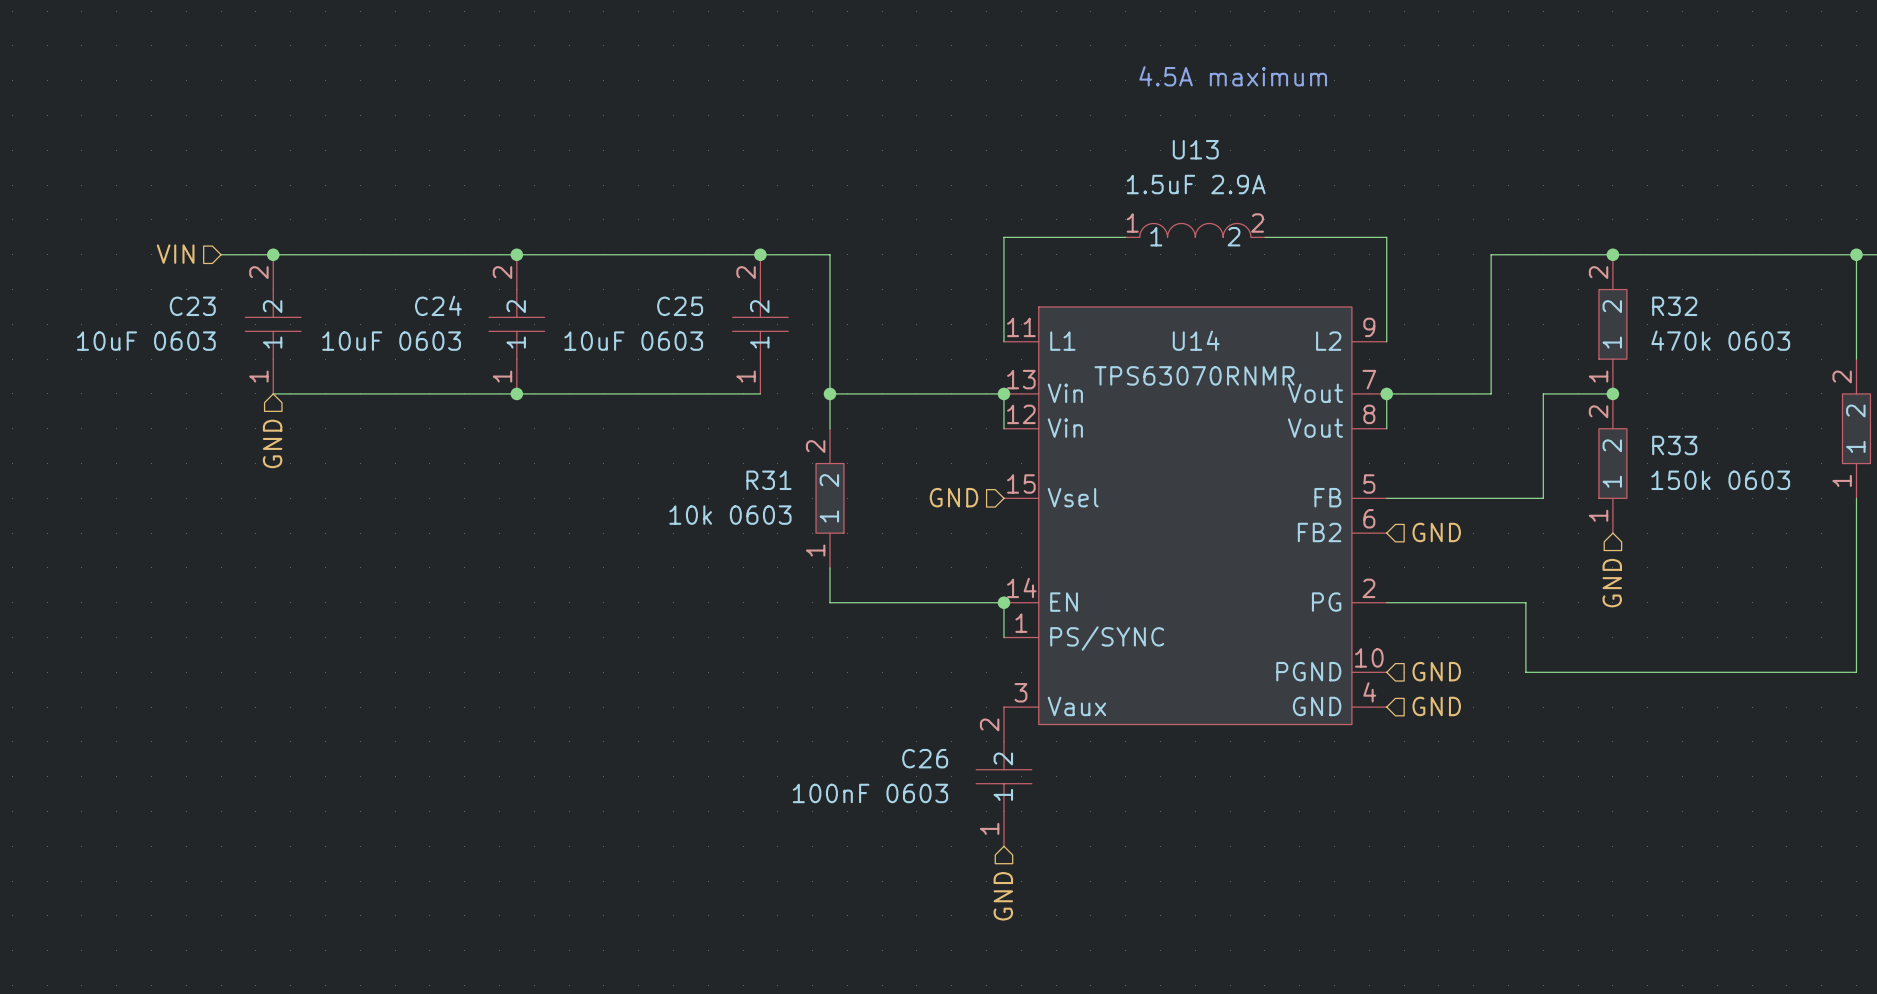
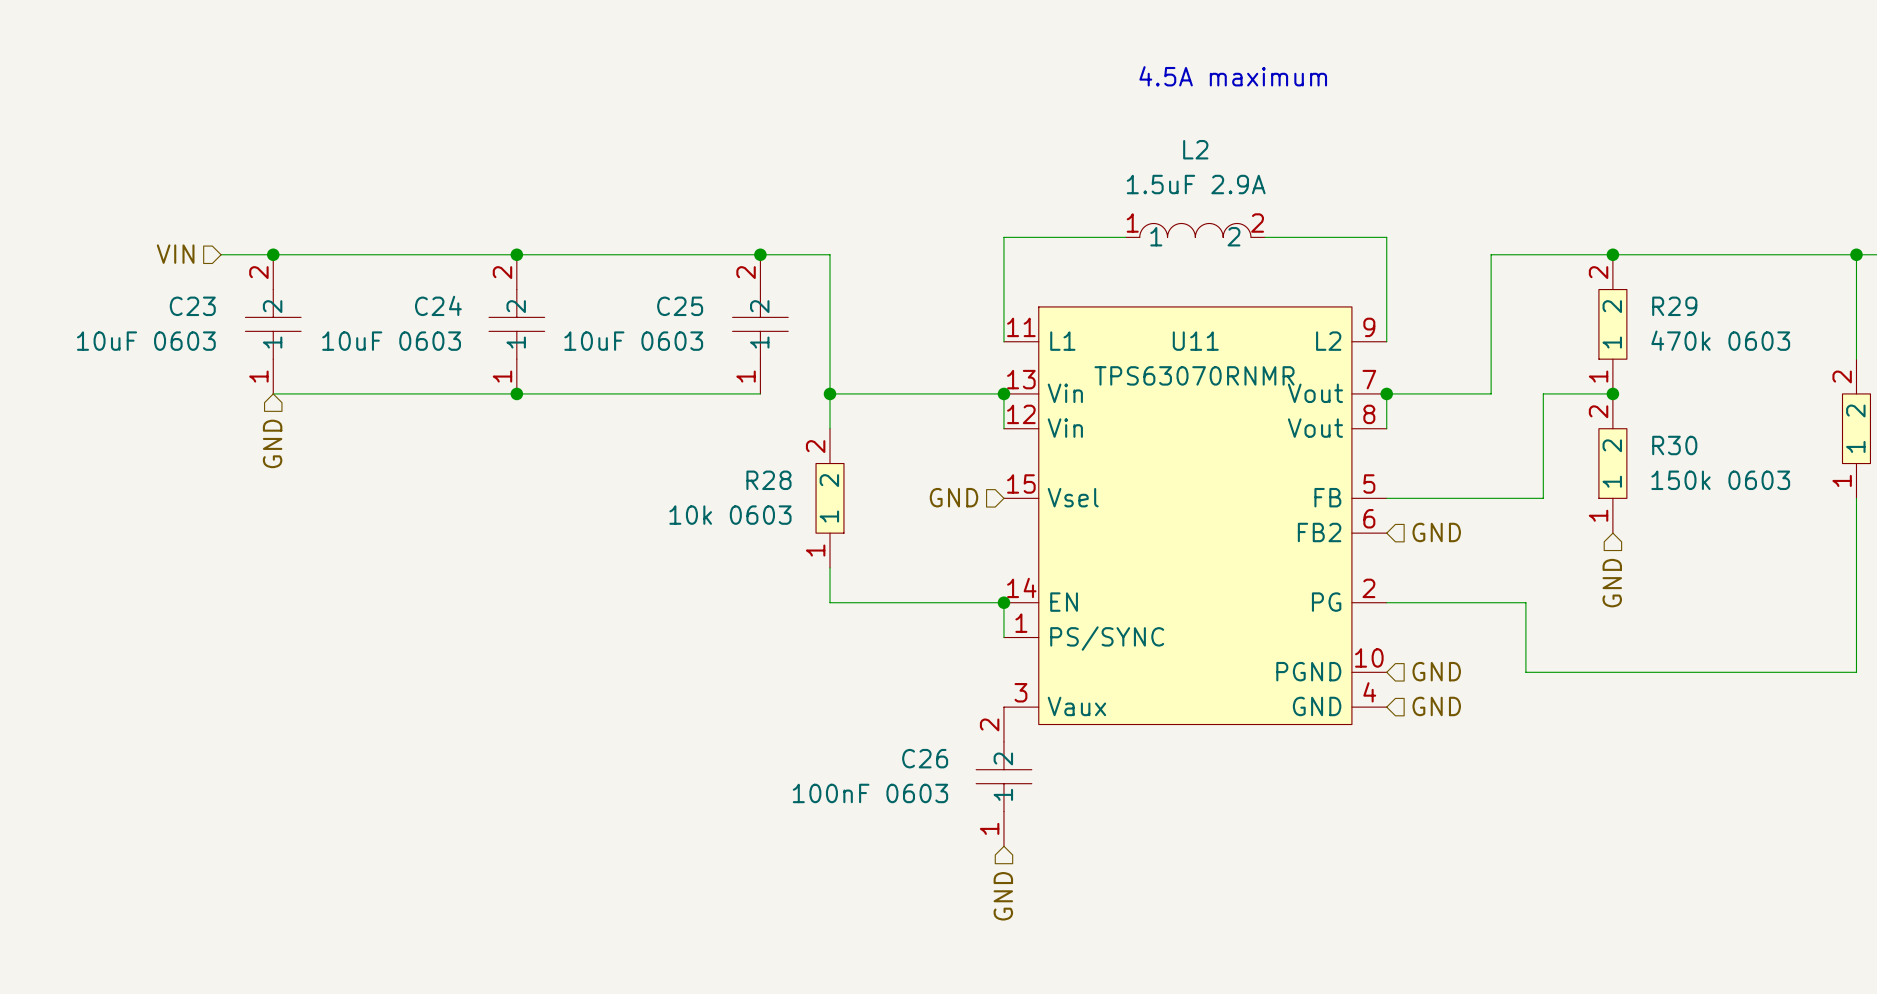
U13 name: U13 (1195, 149) -> L2 (1195, 149)
R32 name: R32 (1674, 306) -> R29 (1674, 306)
U14 name: U14 (1196, 340) -> U11 (1195, 341)
R33 name: R33 (1674, 445) -> R30 (1674, 445)
R31 name: R31 (768, 480) -> R28 (768, 480)

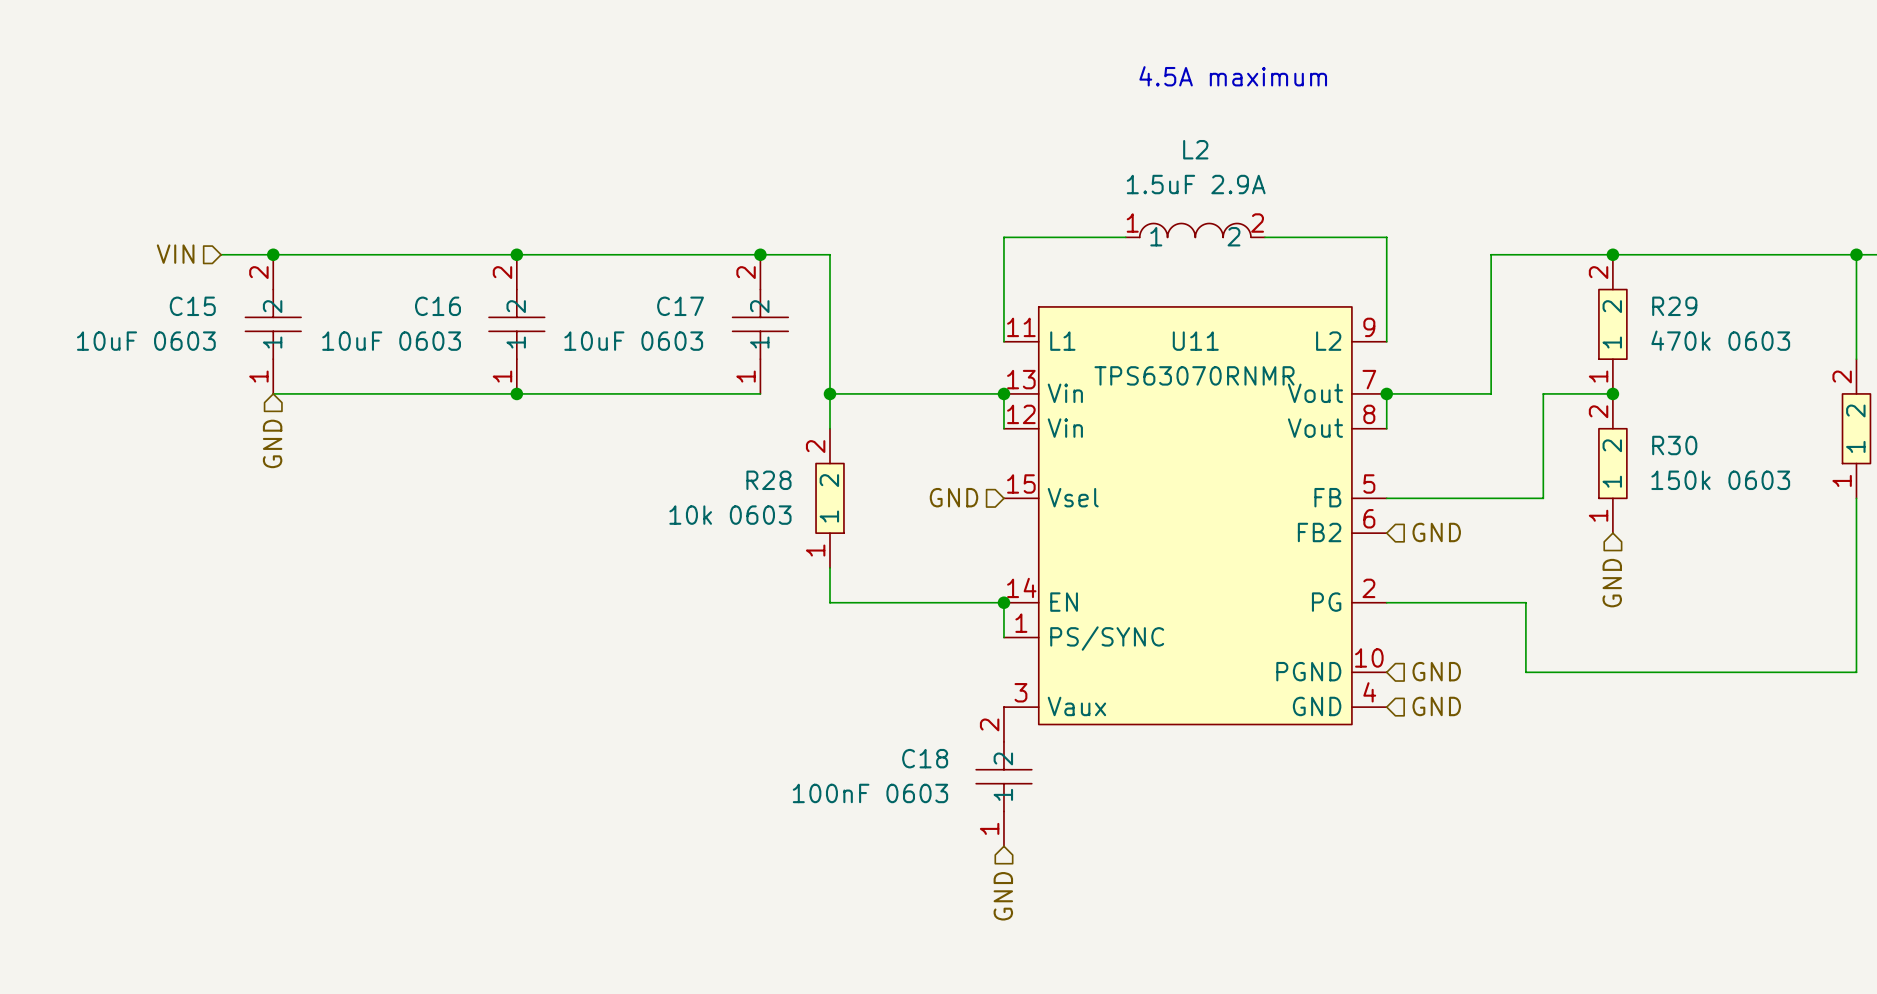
C24 name: C24 (438, 305) -> C16 (437, 306)
C23 name: C23 (192, 306) -> C15 (192, 306)
C25 name: C25 (680, 306) -> C17 (680, 306)
C26 name: C26 (925, 758) -> C18 (925, 758)

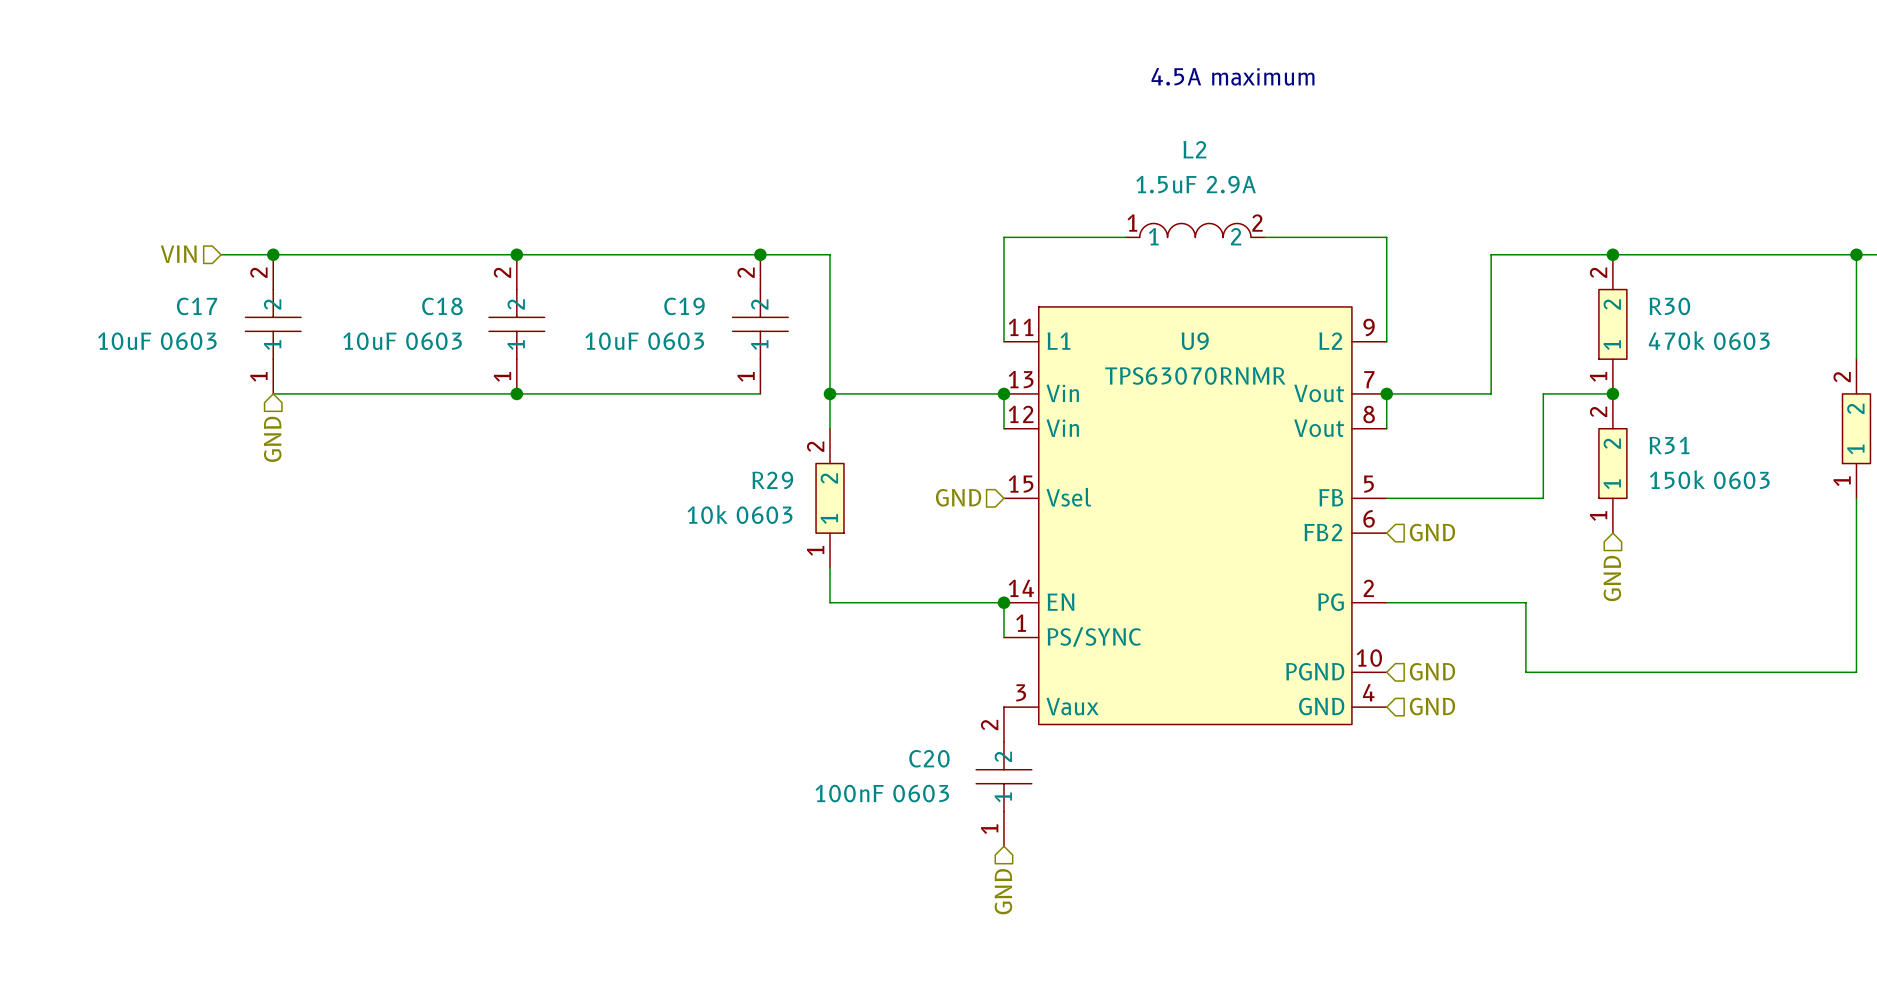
C15 name: C15 (192, 306) -> C17 (197, 306)
C16 name: C16 (437, 306) -> C18 (442, 306)
C17 name: C17 (680, 306) -> C19 (684, 306)
R29 name: R29 (1674, 306) -> R30 (1669, 306)
U11 name: U11 (1195, 341) -> U9 (1195, 341)
R30 name: R30 (1674, 445) -> R31 (1669, 445)
R28 name: R28 (768, 480) -> R29 (772, 480)
C18 name: C18 (925, 758) -> C20 (929, 758)

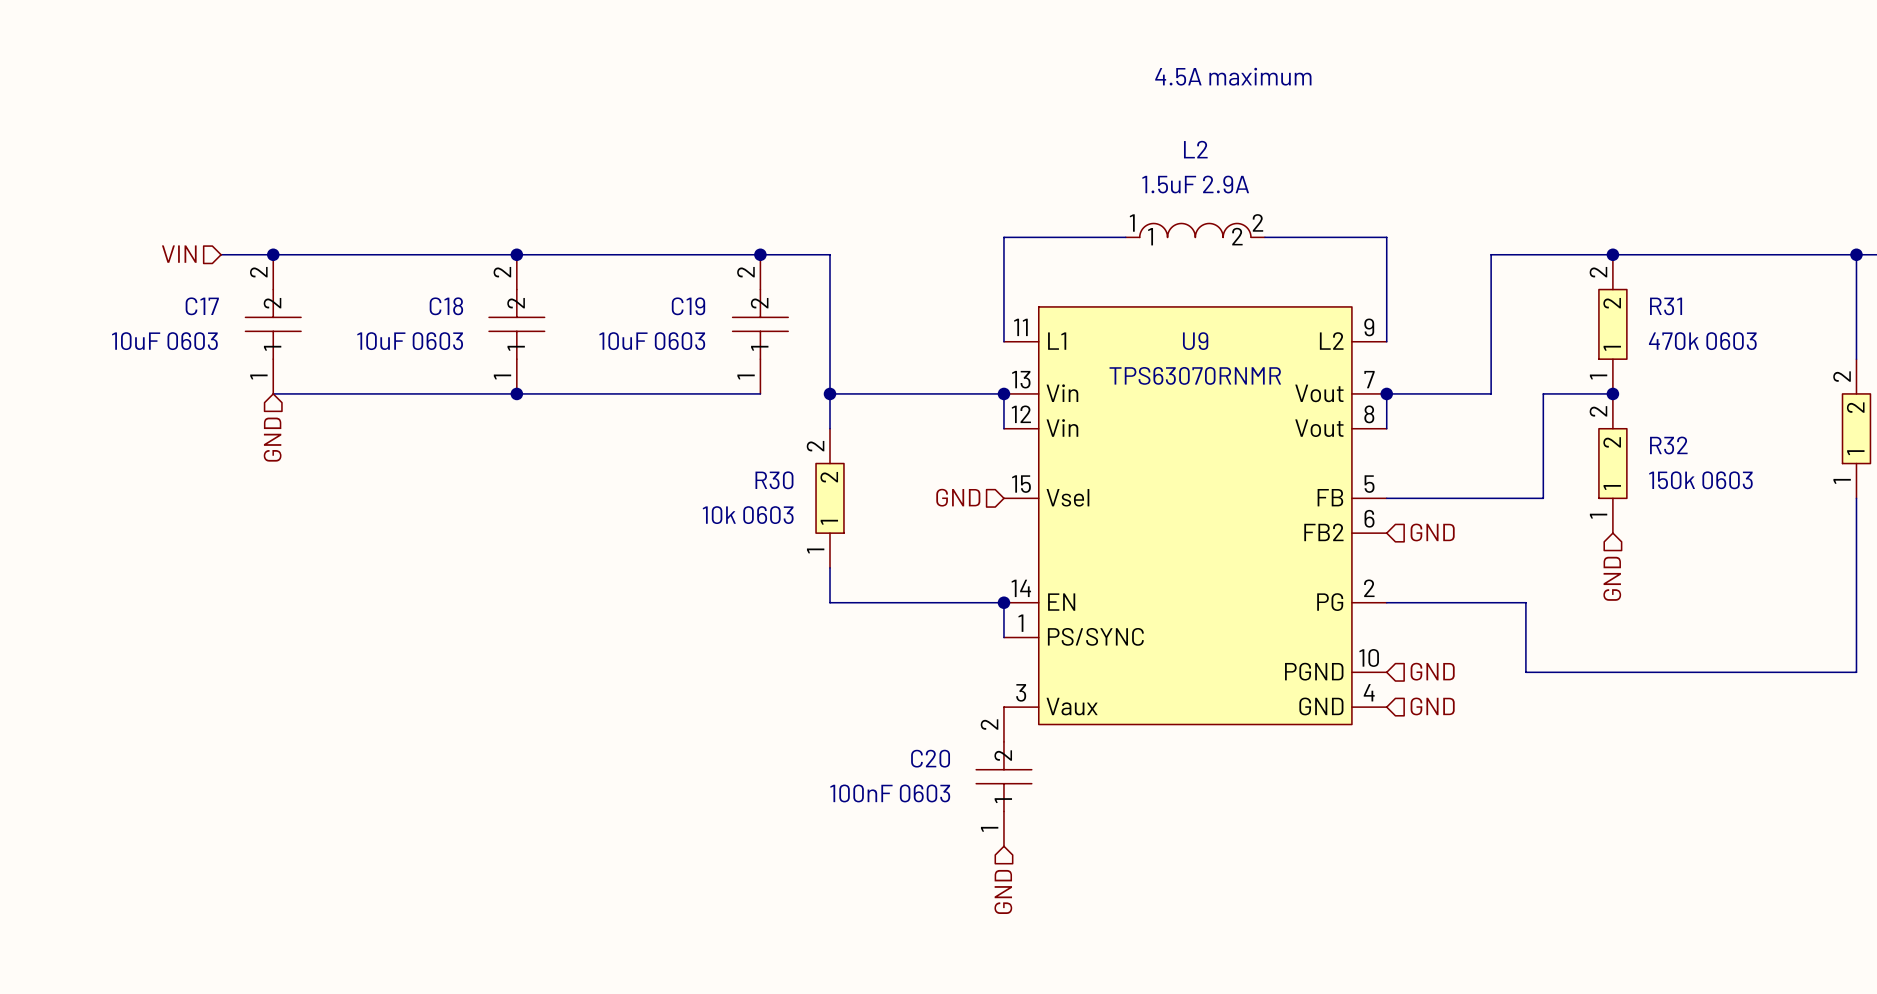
R30 name: R30 (1669, 306) -> R31 (1666, 306)
R31 name: R31 (1669, 445) -> R32 (1668, 445)
R29 name: R29 (772, 480) -> R30 (774, 480)

